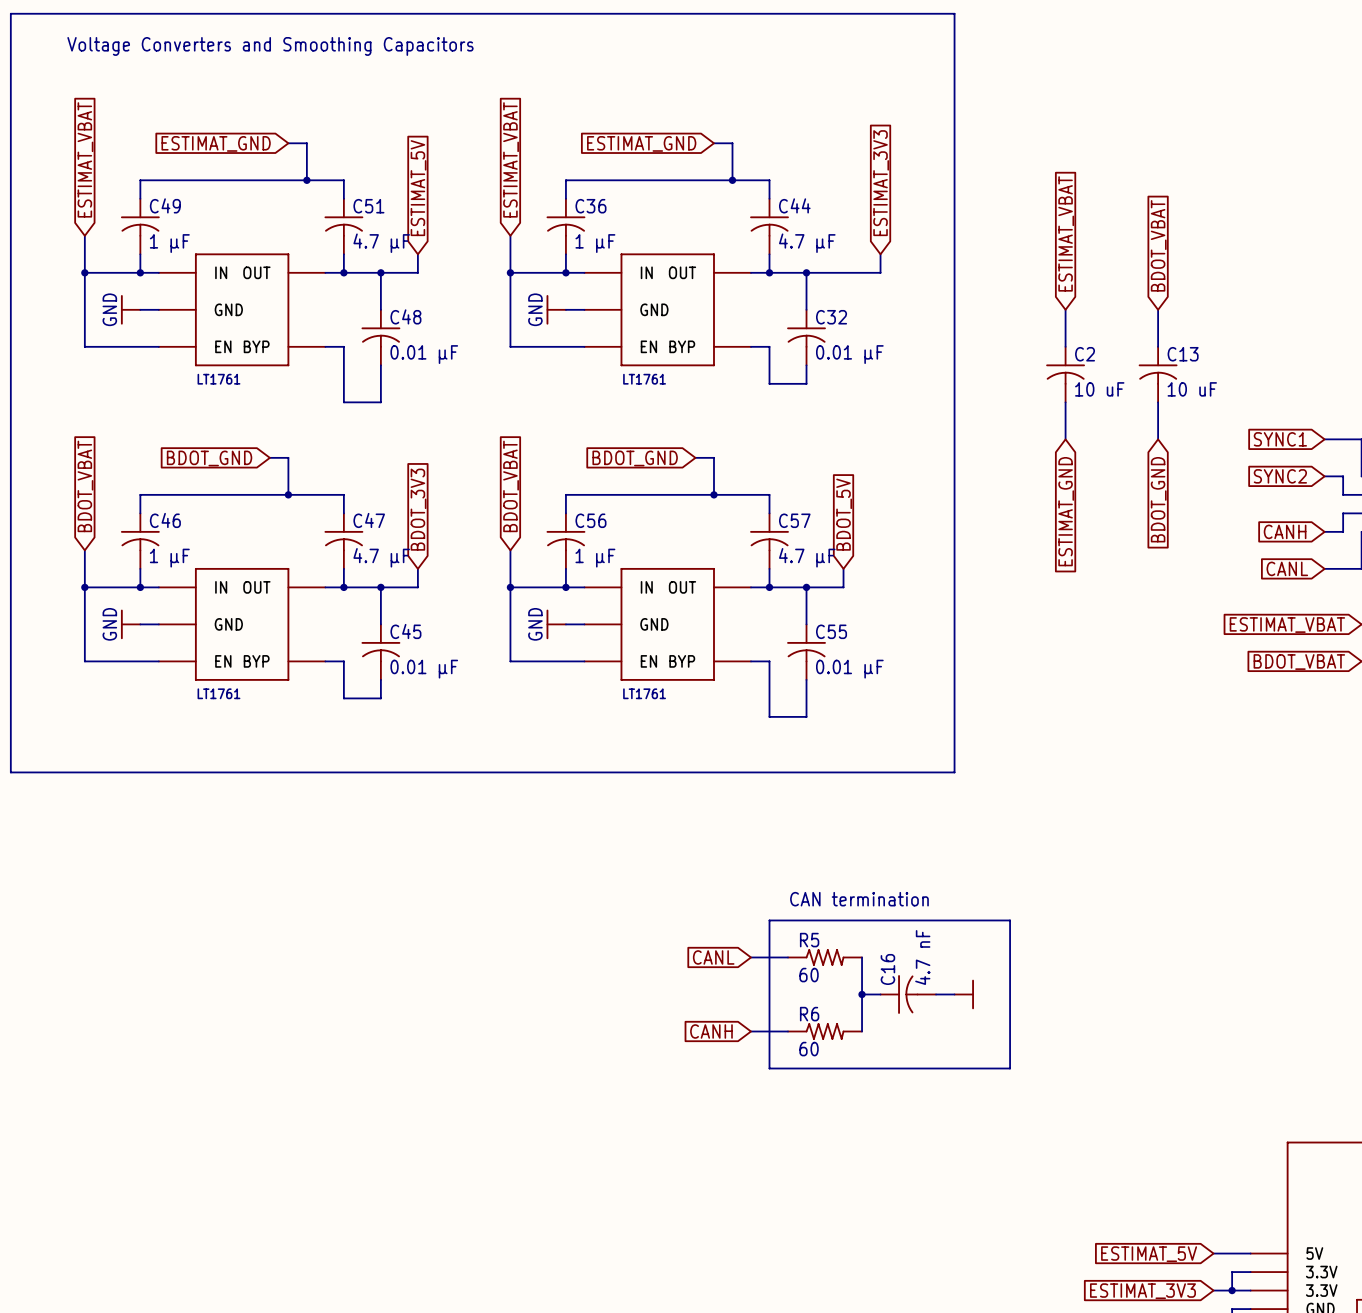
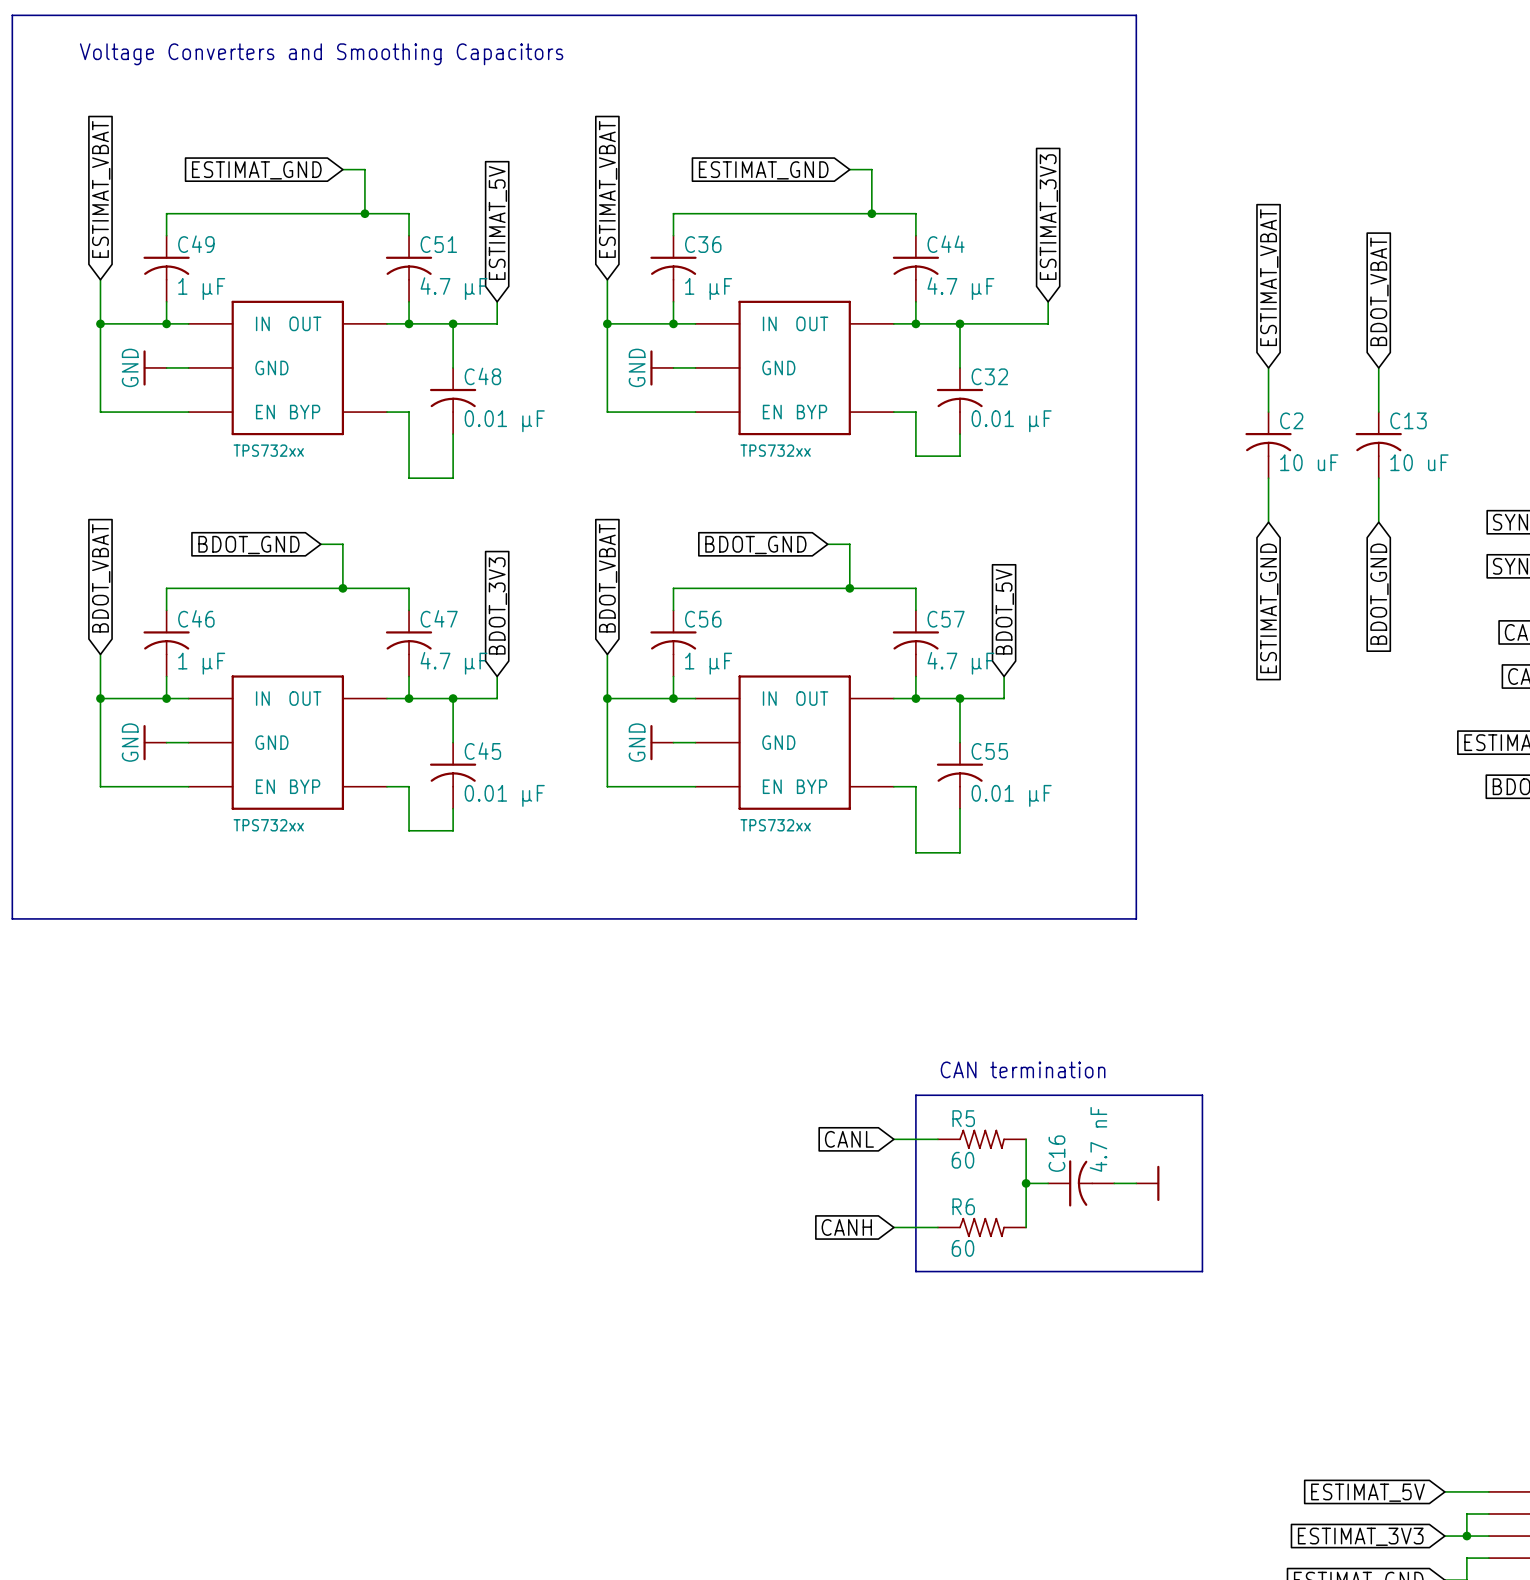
part text: LT1761 (218, 379) -> TPS732xx (268, 450)
part text: LT1761 (644, 379) -> TPS732xx (775, 450)
part text: LT1761 (218, 693) -> TPS732xx (268, 825)
part text: LT1761 (644, 693) -> TPS732xx (775, 825)

